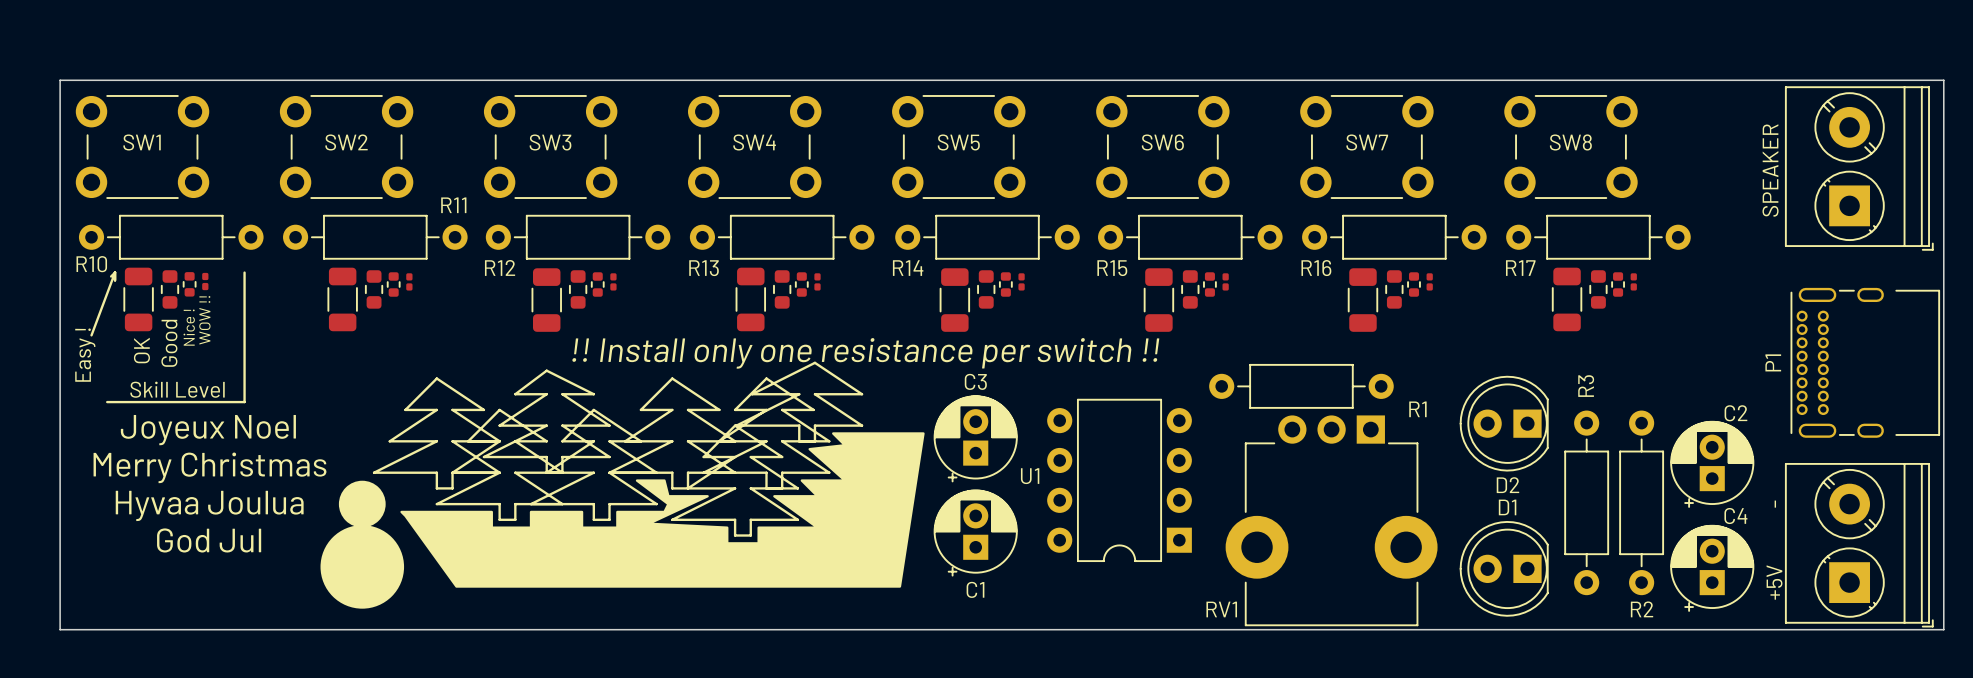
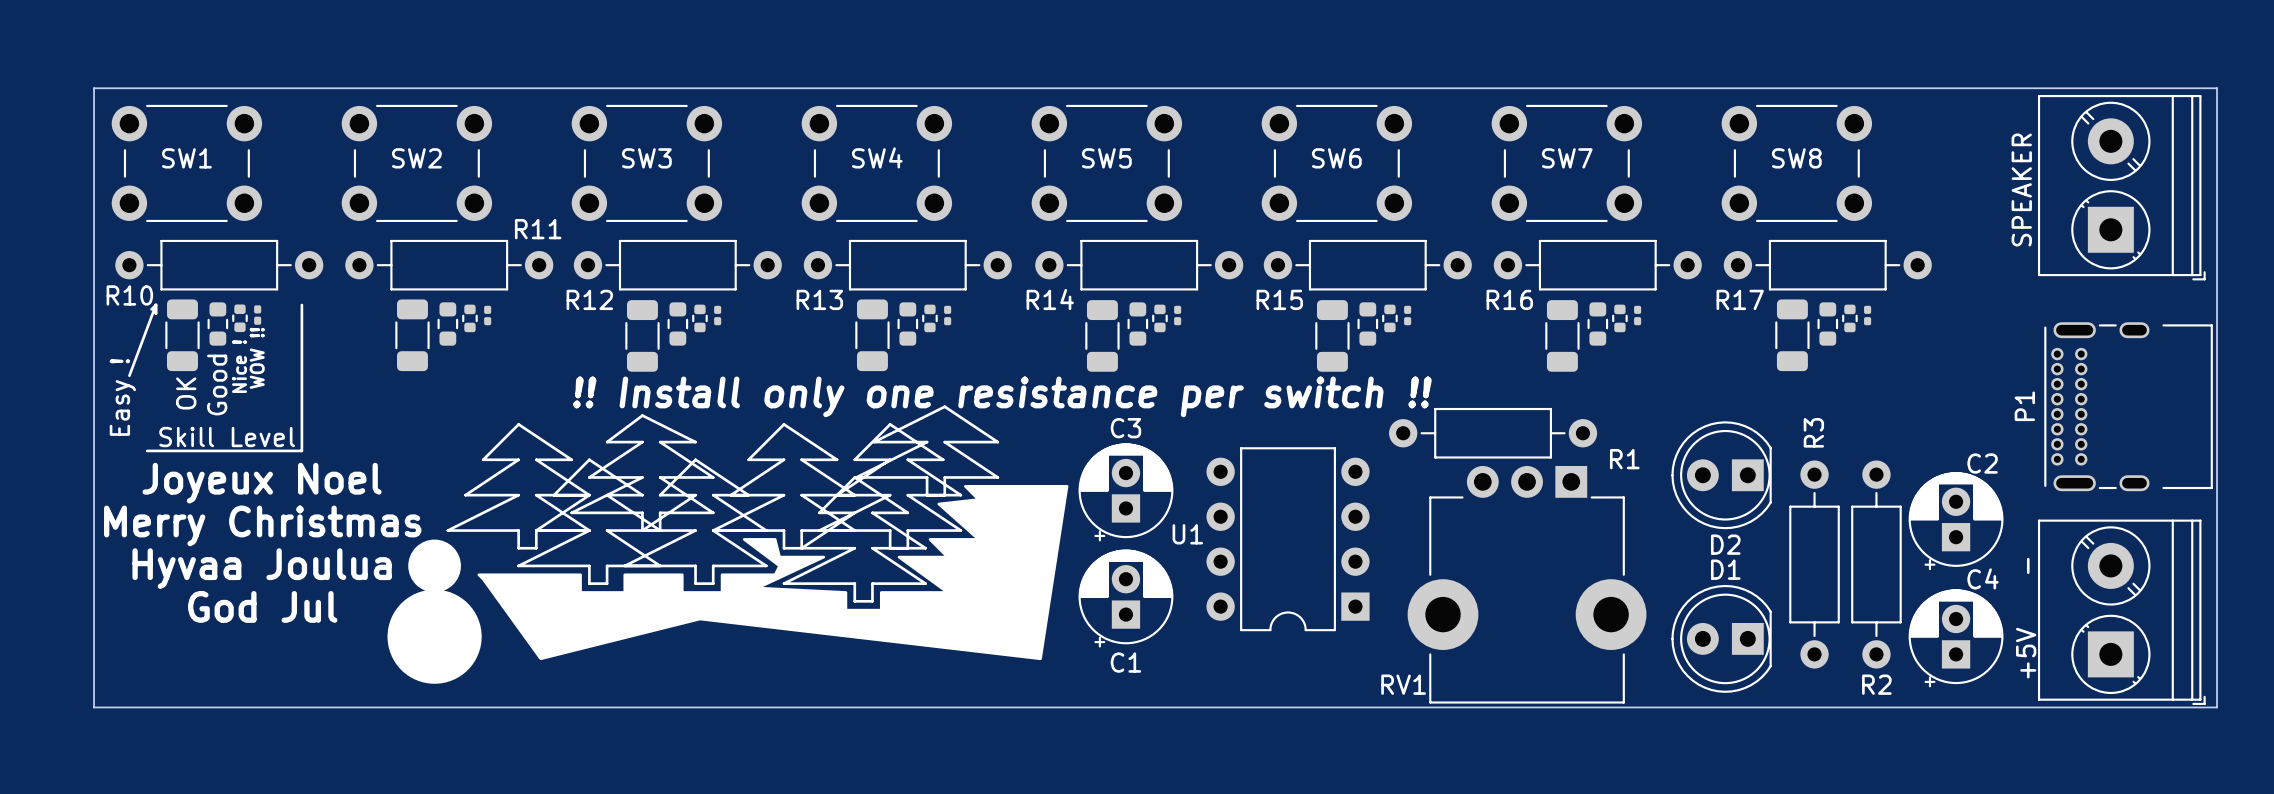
drawing shape: [400, 432, 925, 588] -> [477, 484, 1069, 661]

